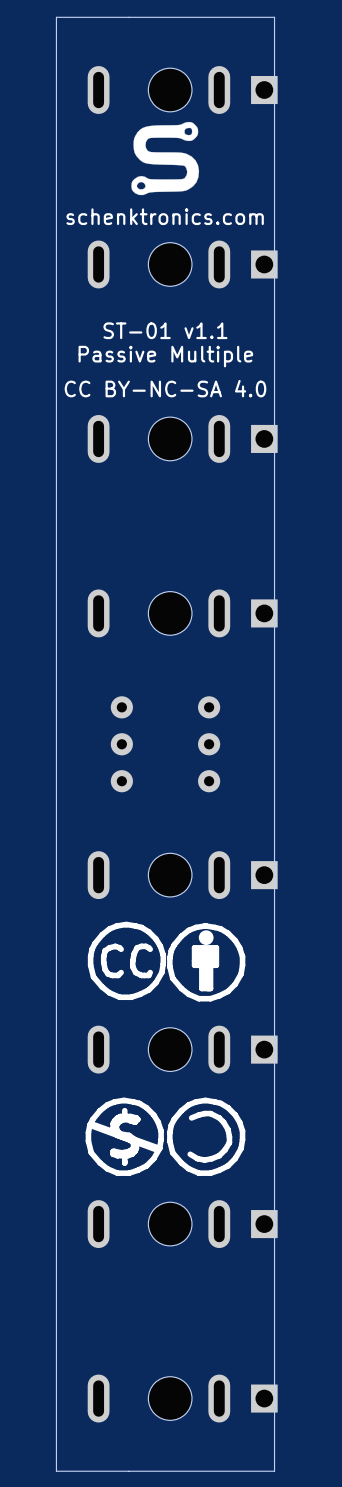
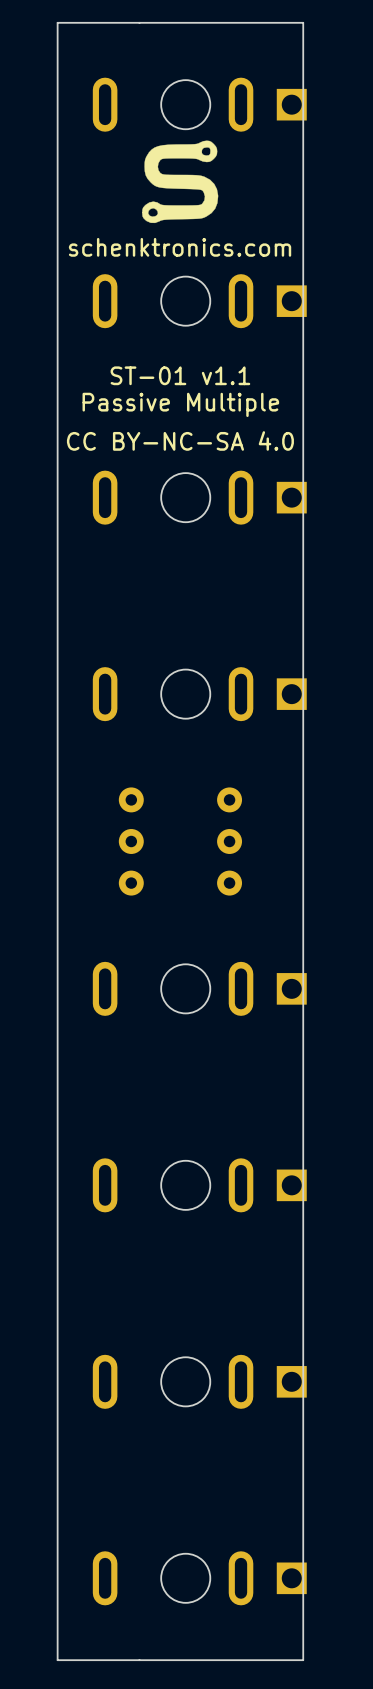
drawing: [87, 921, 246, 1002] -> none
drawing: [85, 1097, 246, 1176] -> none

